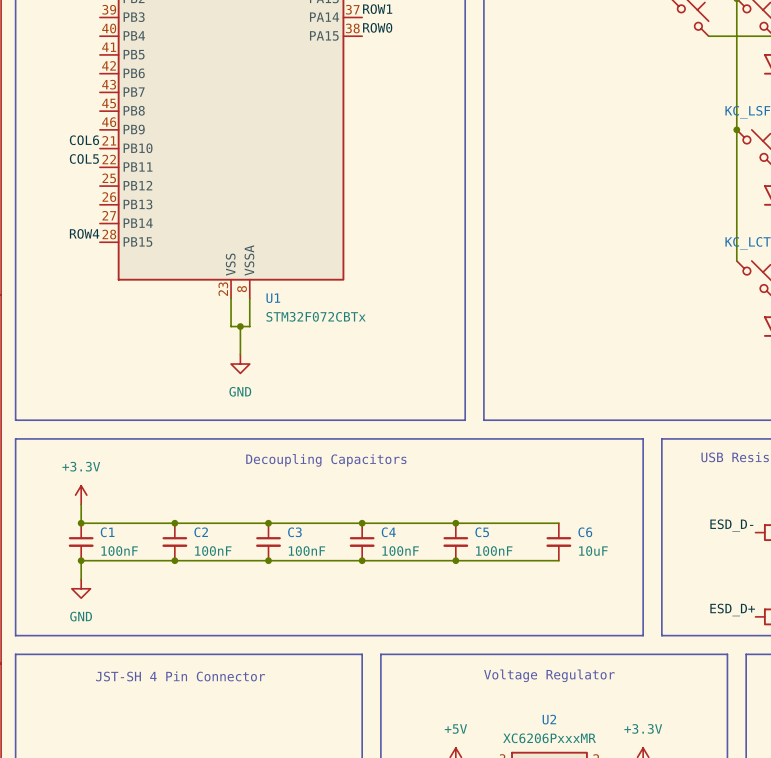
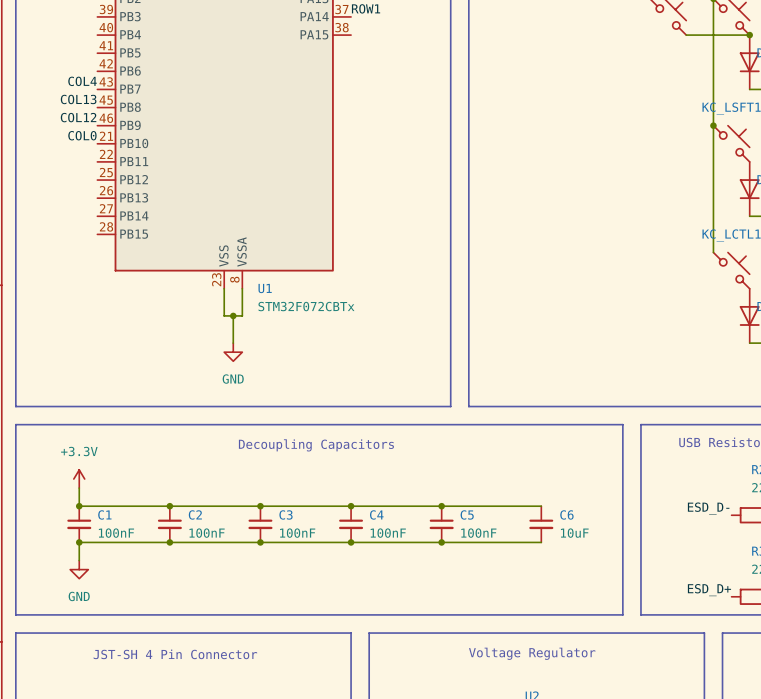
label: ROW0 (377, 27) -> none
label: none -> COL4 (82, 81)
label: none -> COL13 (78, 99)
label: none -> COL12 (78, 117)
label: COL6 (84, 140) -> COL0 (82, 135)
label: COL5 (84, 158) -> none
label: ROW4 (84, 233) -> none

